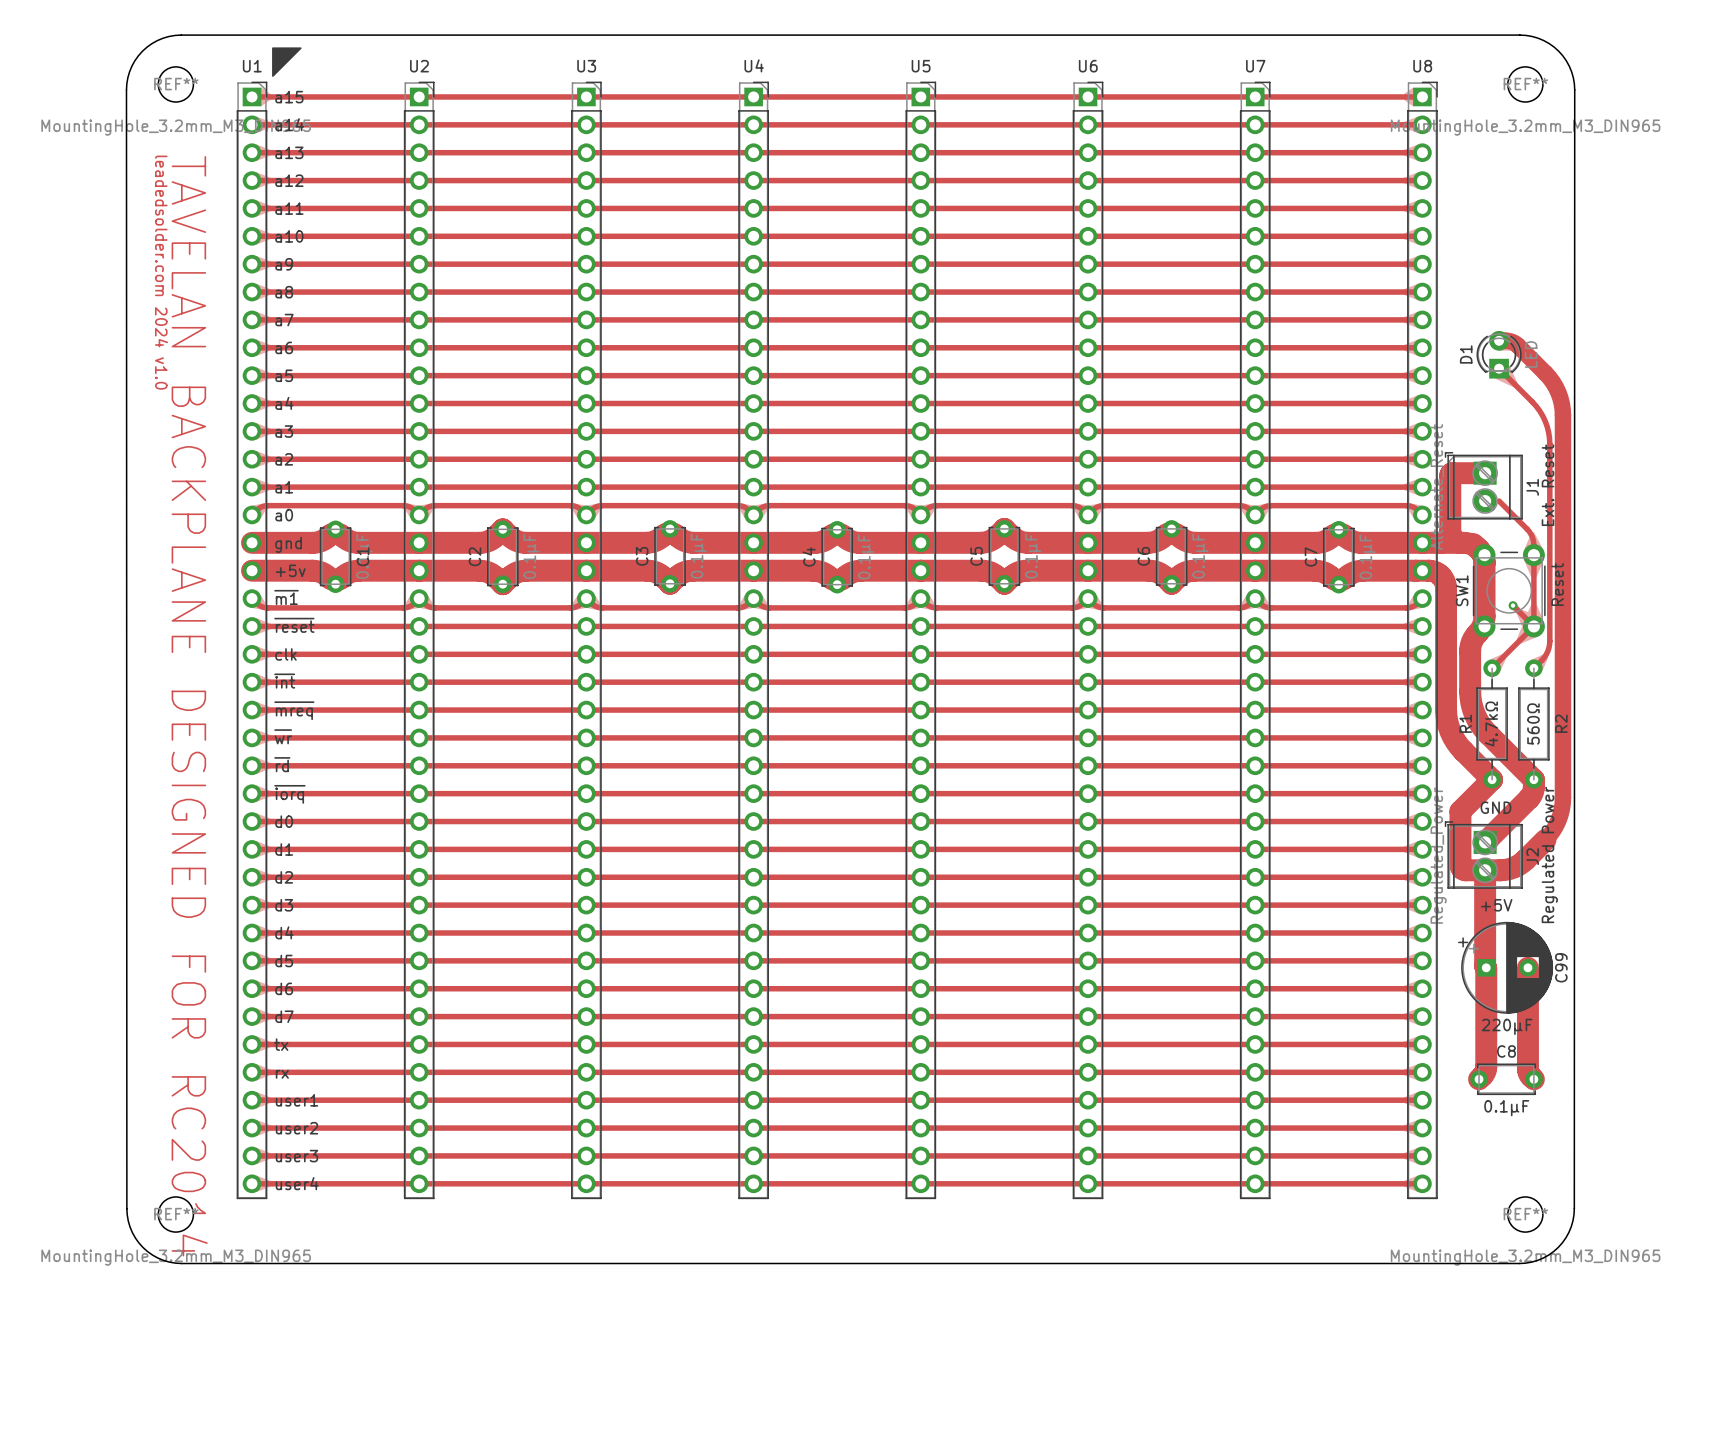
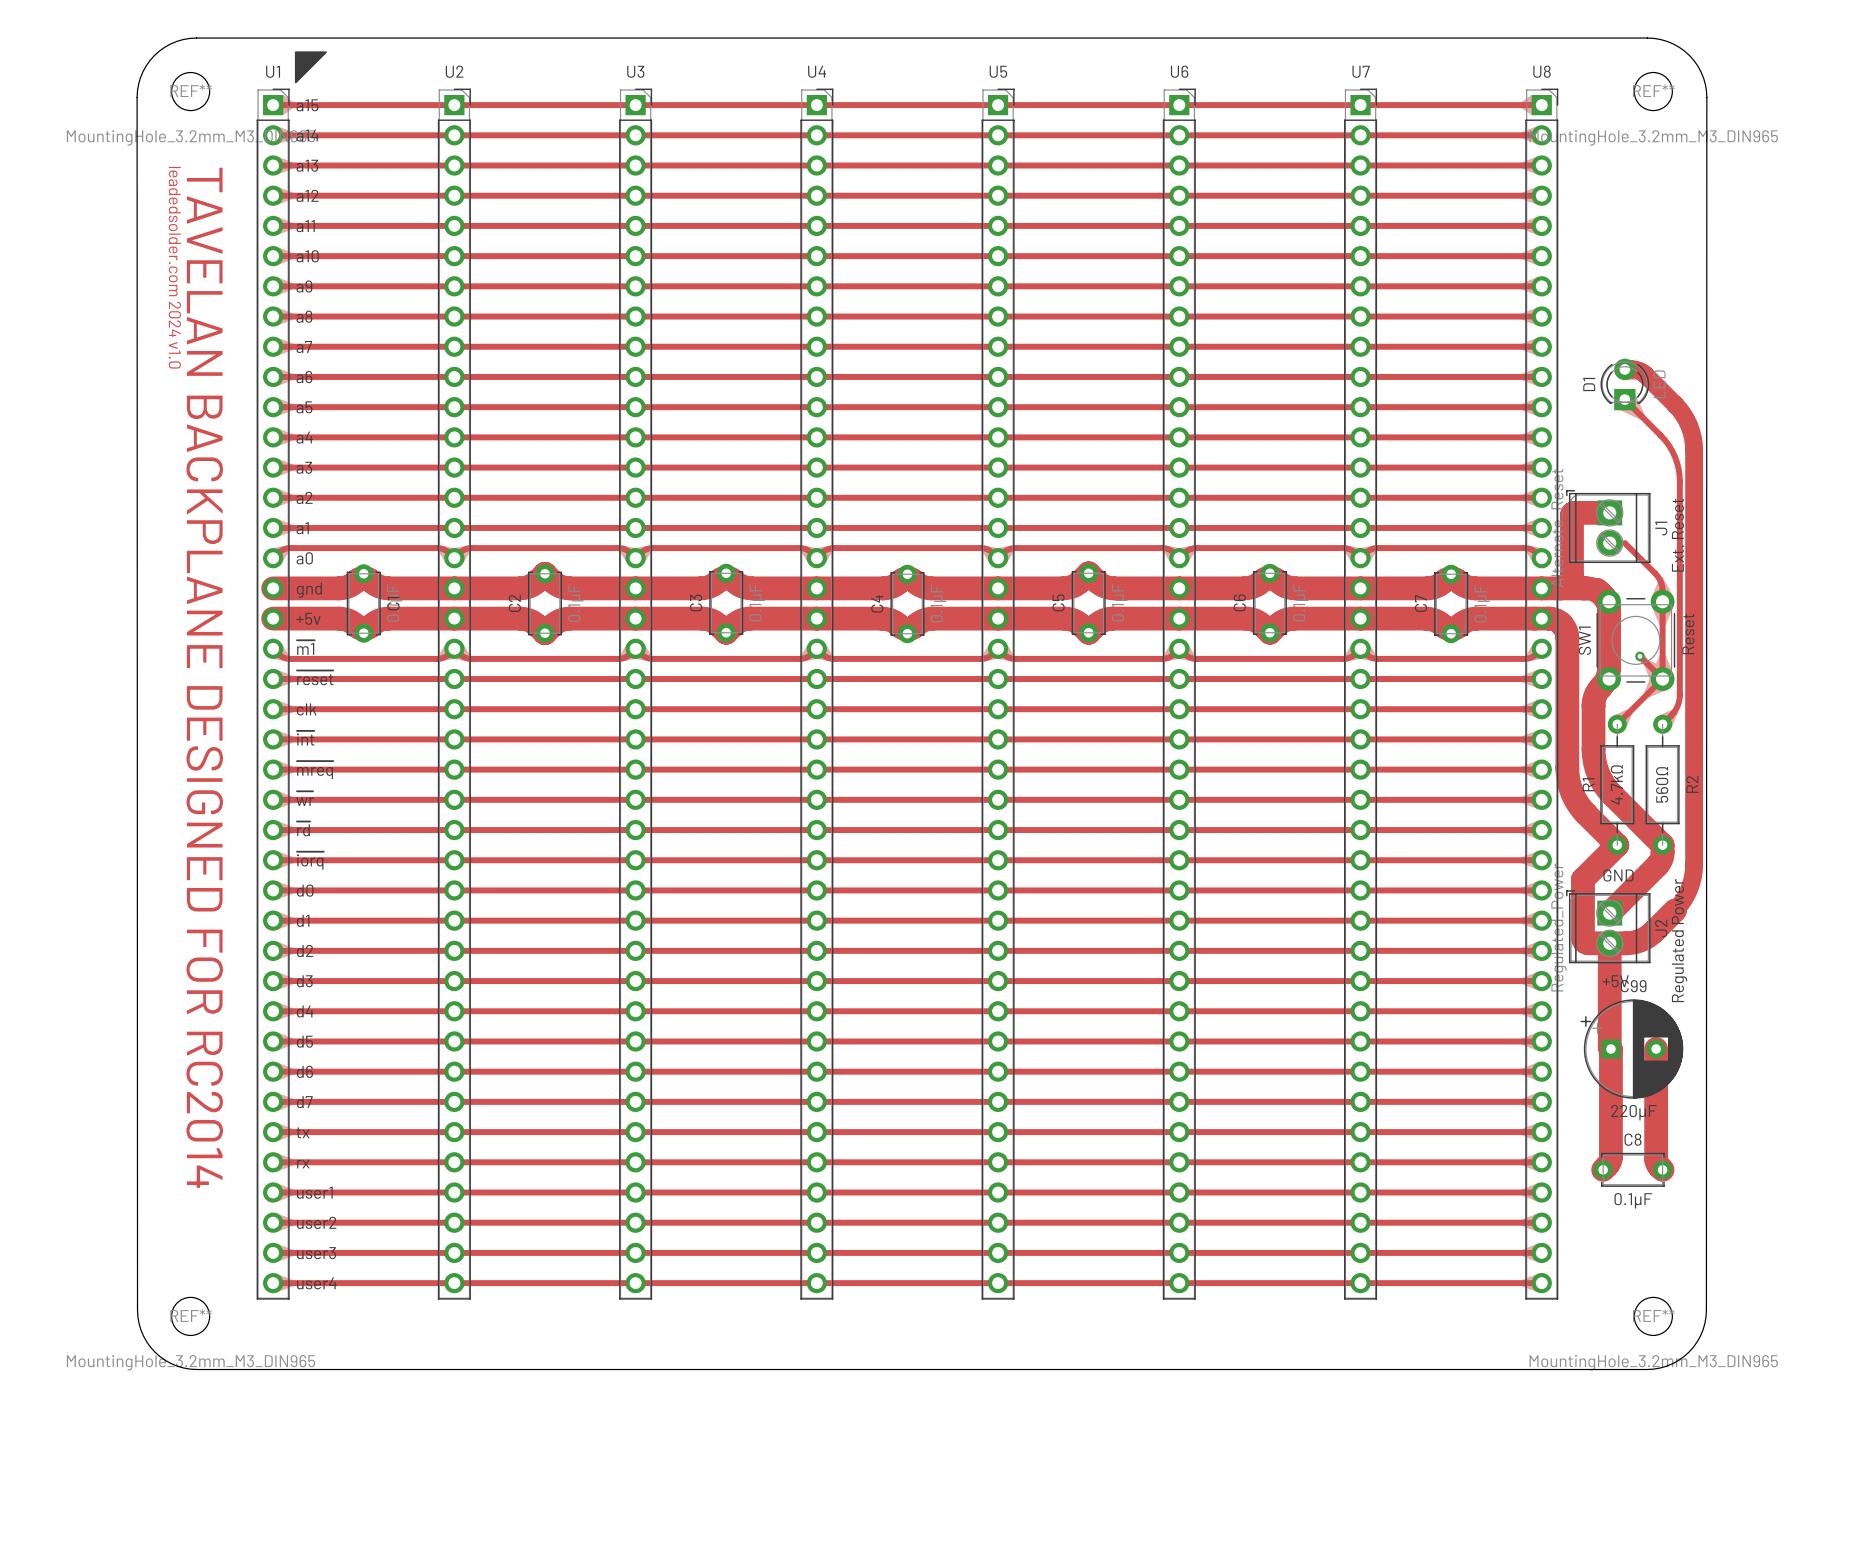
C99 name rotation: 0° (1561, 967) -> 90° clockwise (1633, 986)
C99 name position: C99 (1561, 967) -> C99 (1633, 986)

